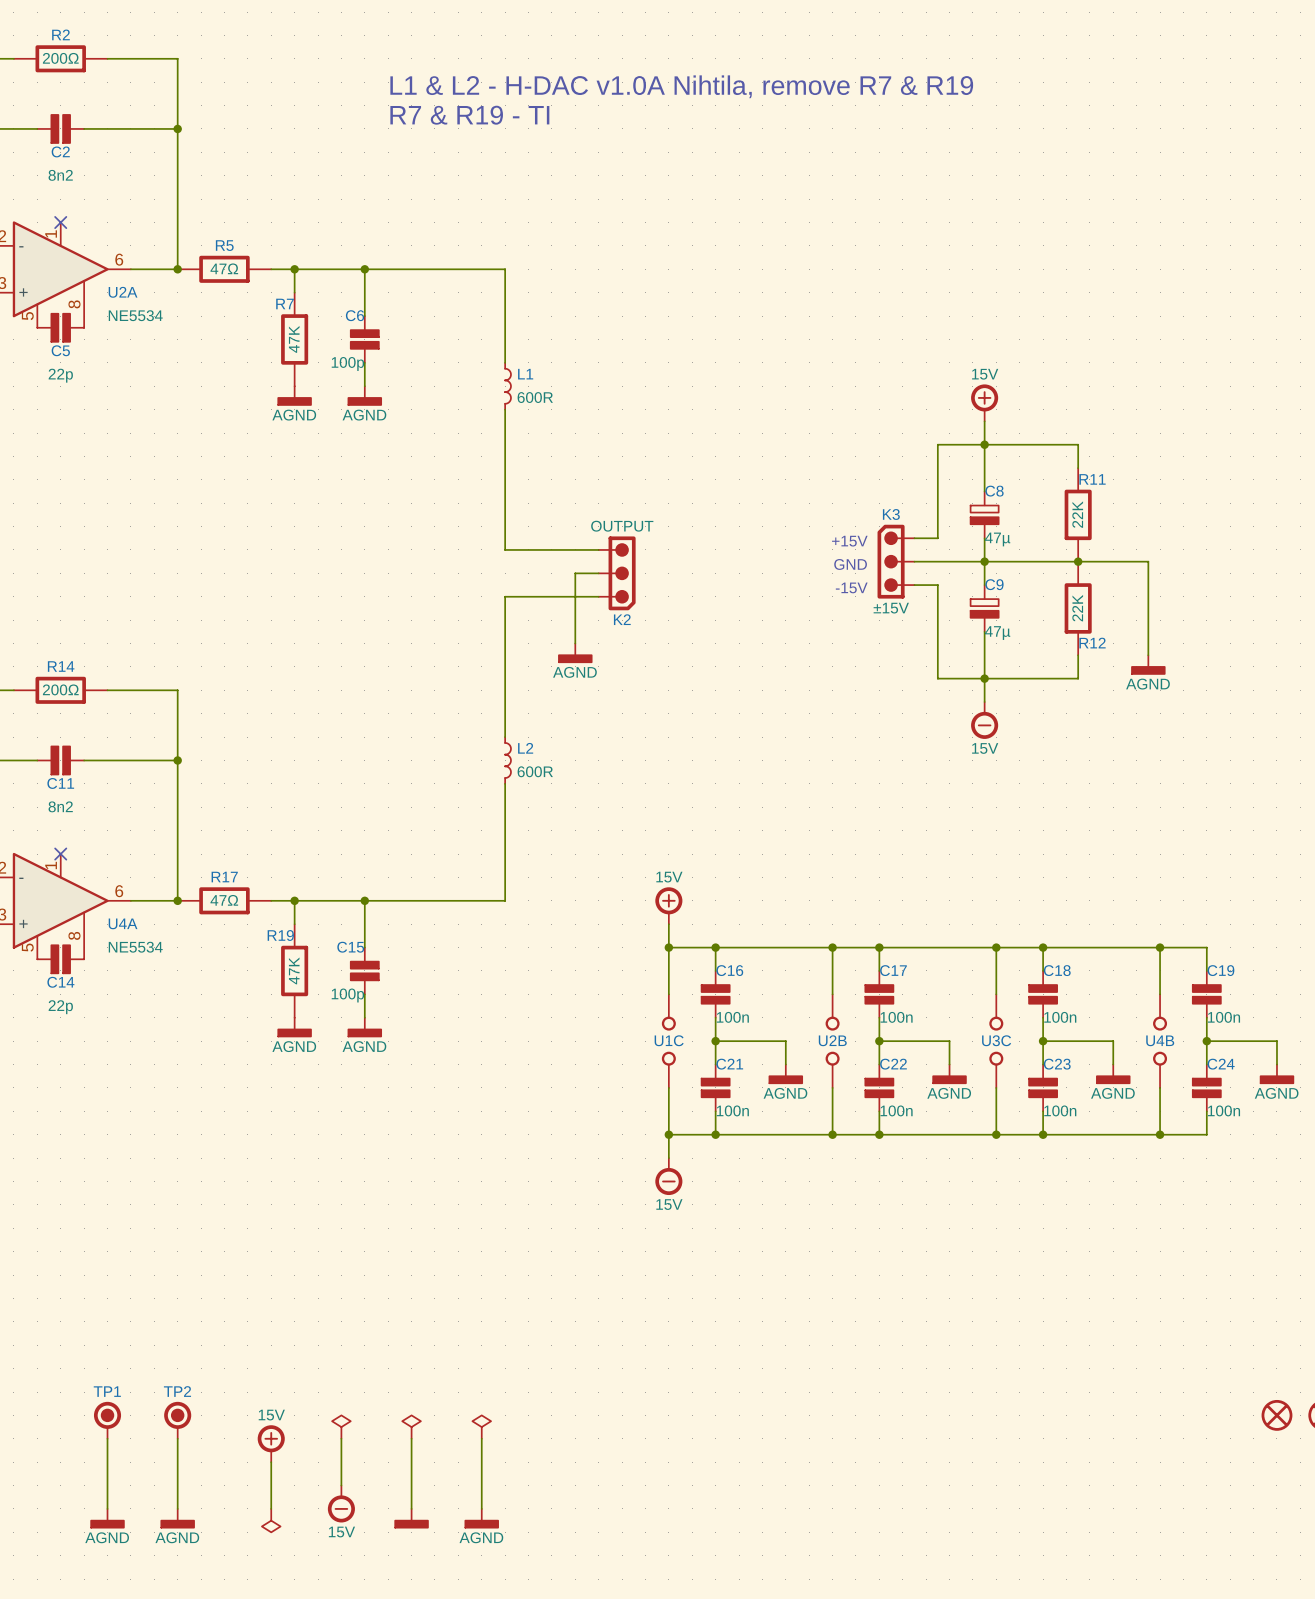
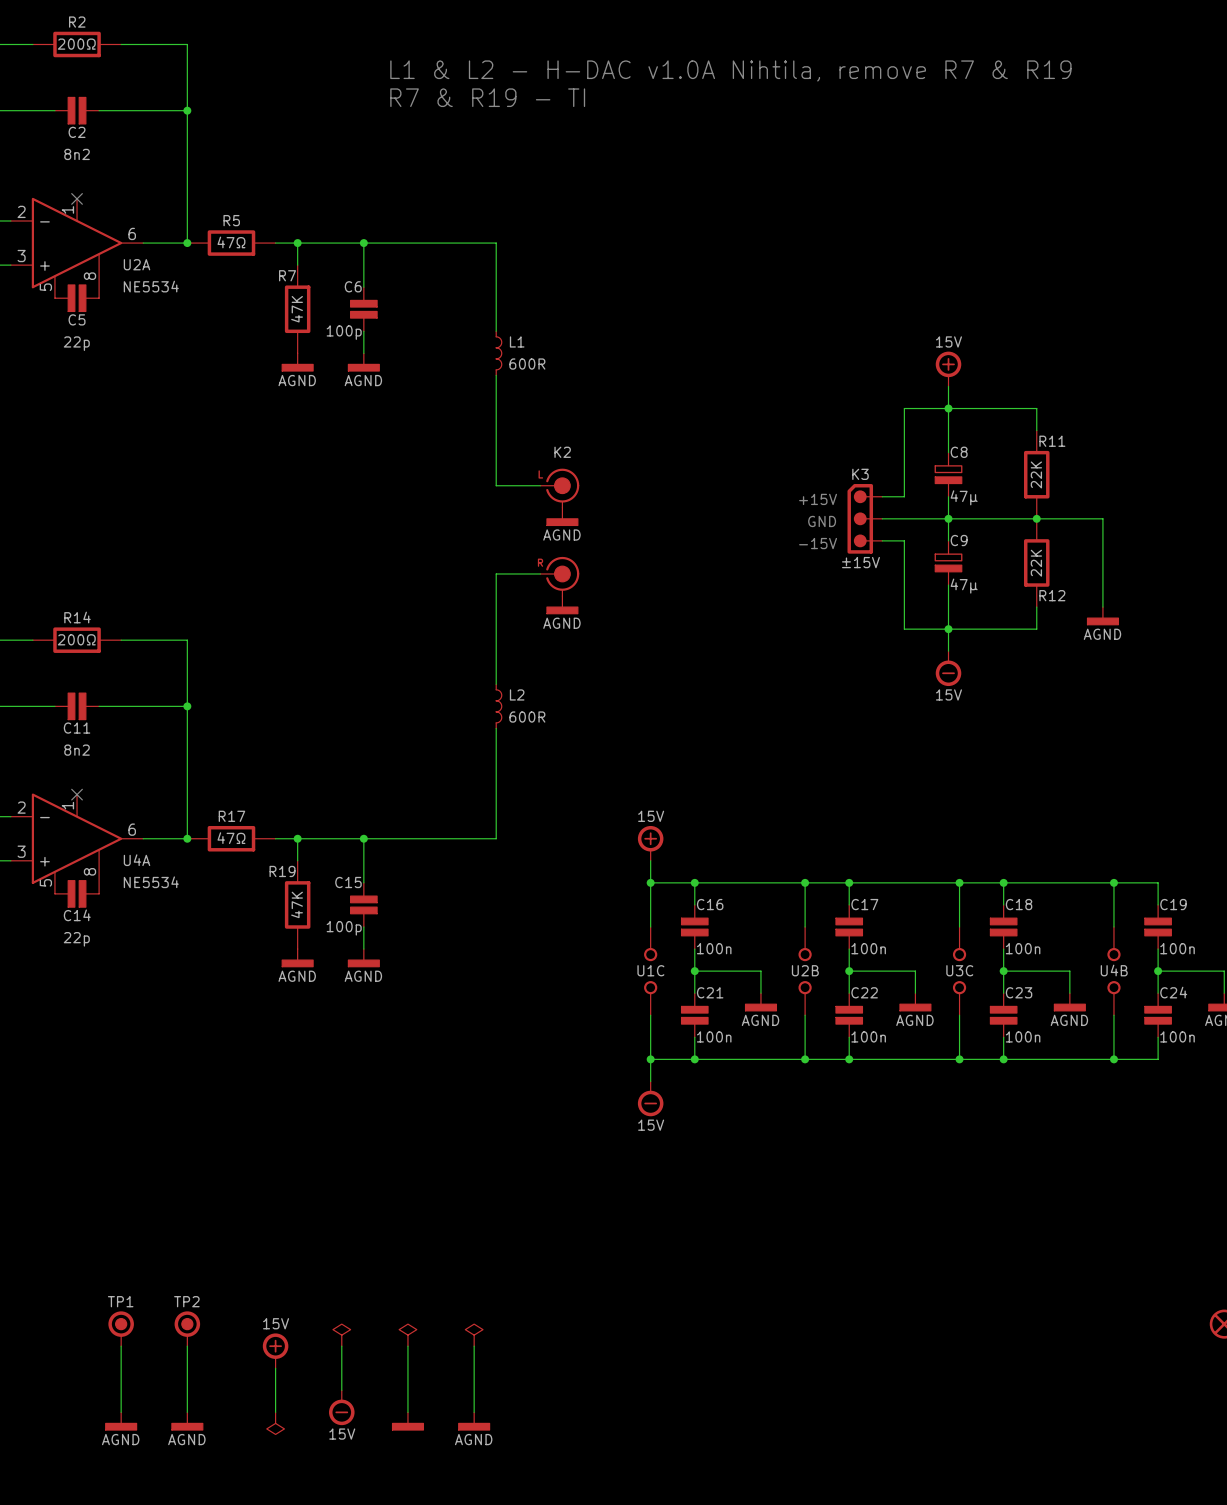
wire: (505, 526) (505, 549) (598, 549) -> (496, 485) (540, 485)
K2 value: OUTPUT (622, 526) -> none
K2 symbol: [598, 536, 636, 611] -> [540, 468, 580, 597]
power symbol: none -> (562, 516)
wire: (598, 573) (575, 573) (575, 643) -> none
wire: (598, 596) (505, 596) (505, 620) -> (540, 573) (496, 573)
K2 name position: K2 (622, 619) -> K2 (562, 452)

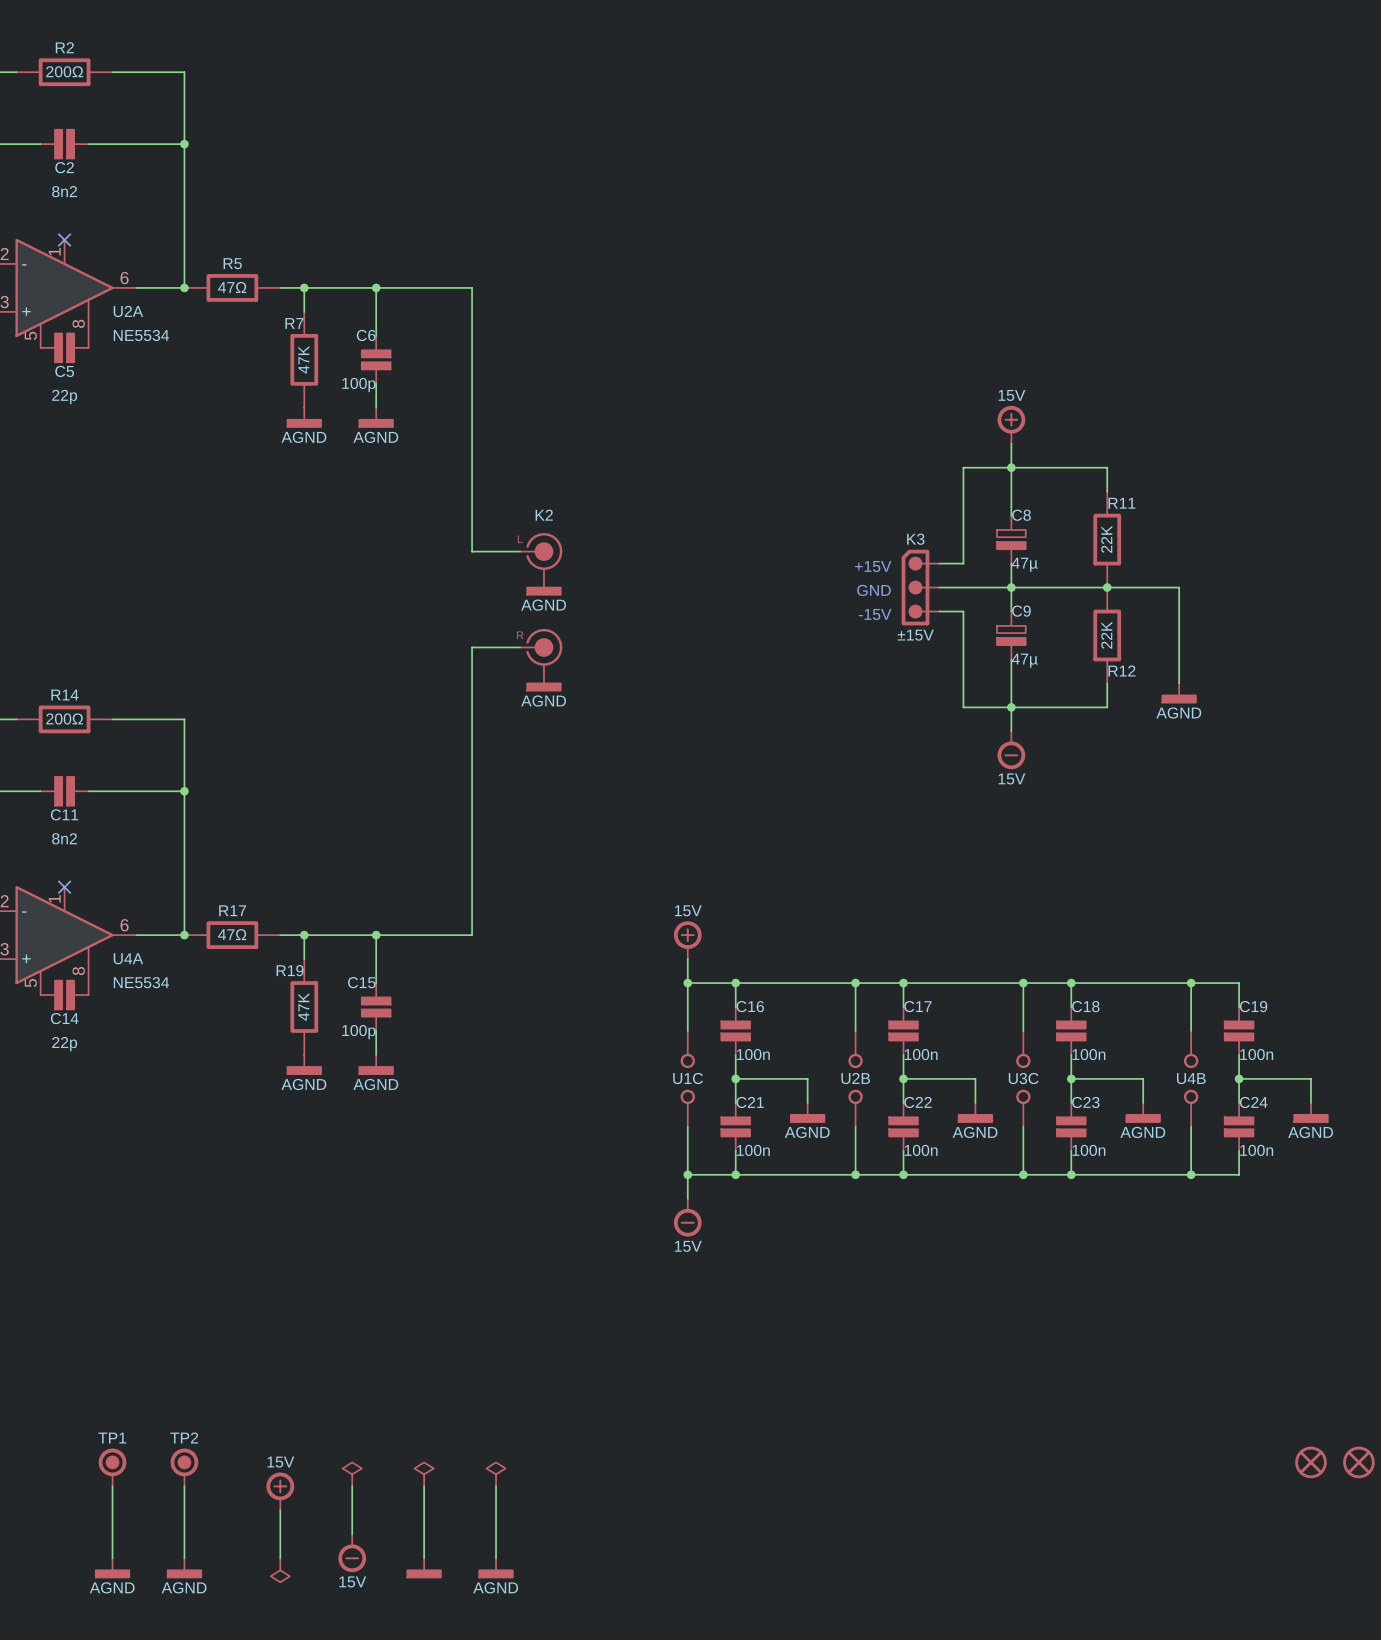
text: L1 & L2 - H-DAC v1.0A Nihtila, remove R7 & R19 (730, 70) -> none
text: R7 & R19 - TI (487, 97) -> none
wire: (452, 243) (496, 243) (496, 331) -> (472, 287) (472, 551) (520, 551)
L1: 600R (498, 353) -> none
wire: (496, 375) (496, 485) (540, 485) -> none
power symbol position: (562, 516) -> (543, 585)
K2 position: (559, 532) -> (541, 602)
wire: (540, 573) (496, 573) (496, 684) -> none
power symbol position: (562, 604) -> (543, 681)
L2: 600R (498, 706) -> none
wire: (496, 728) (496, 838) (452, 838) -> (520, 647) (472, 647) (472, 935)

